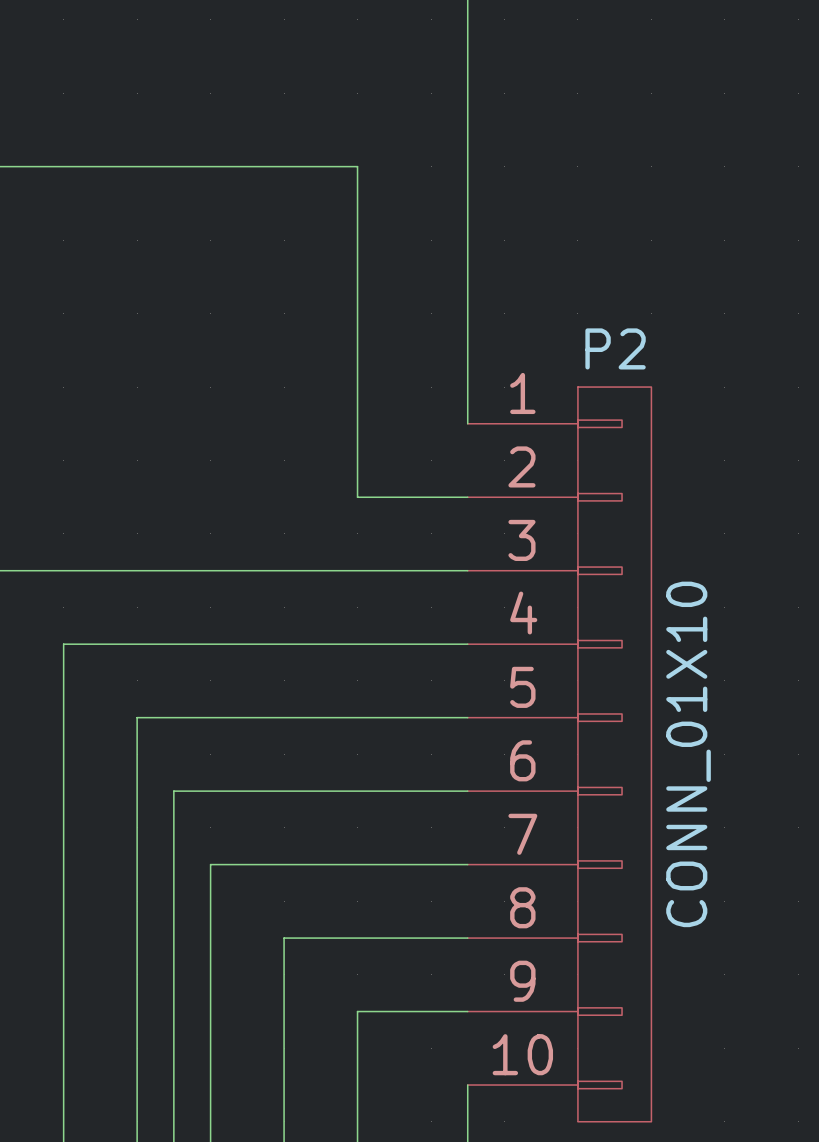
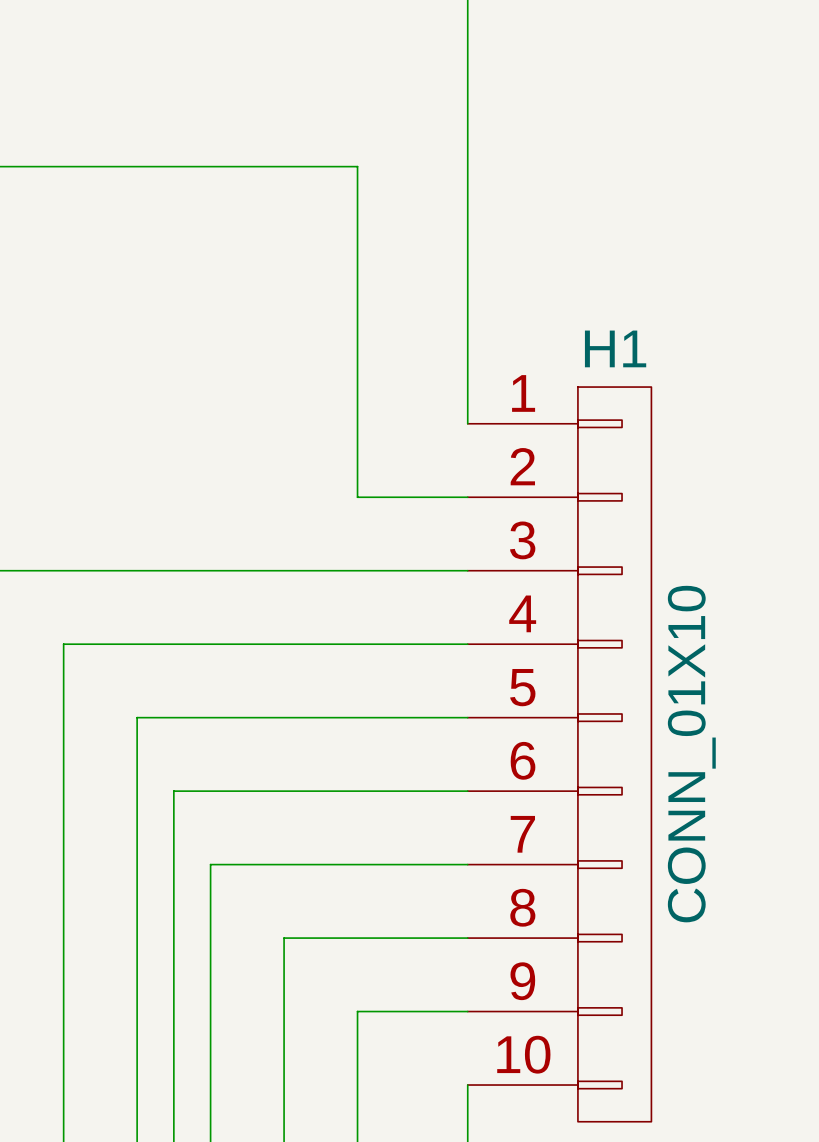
P2 name: P2 (615, 348) -> H1 (615, 348)

